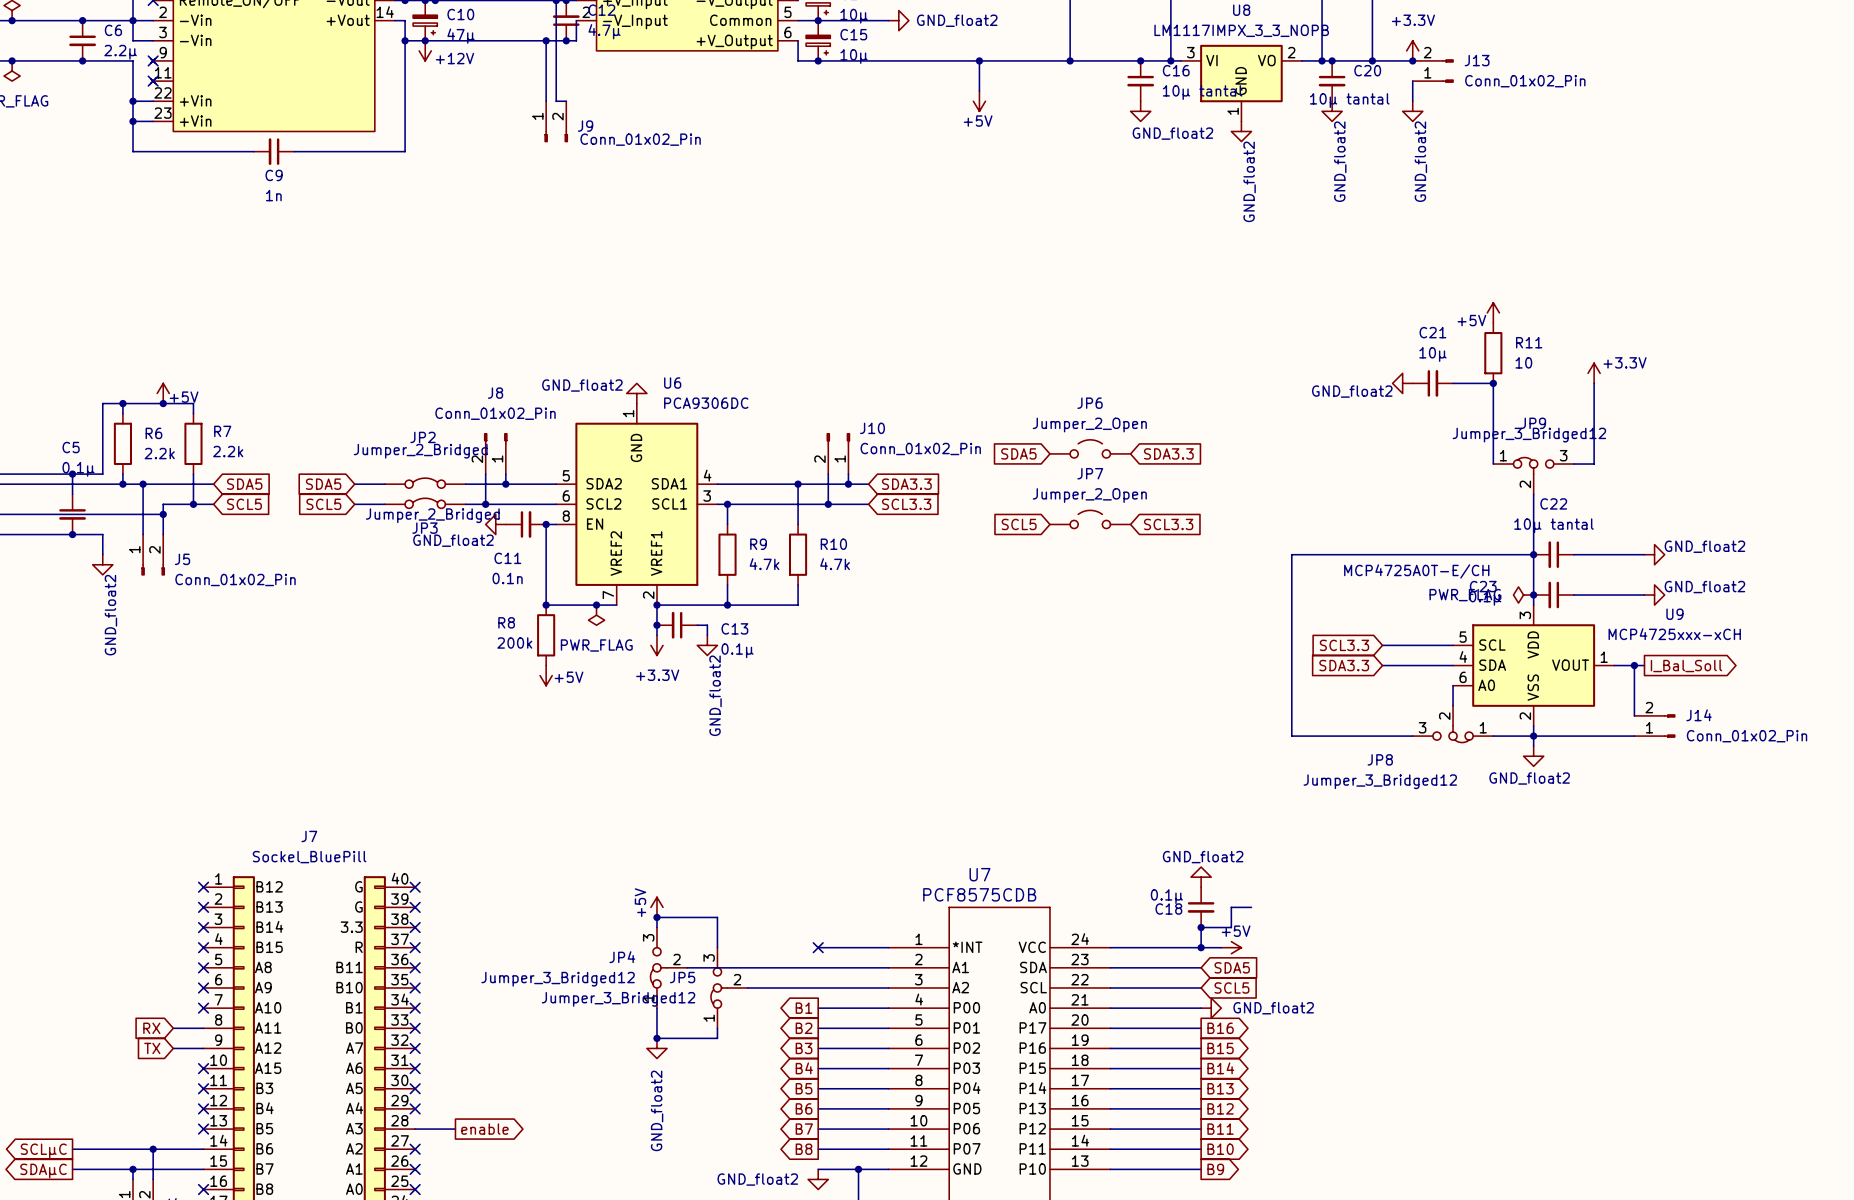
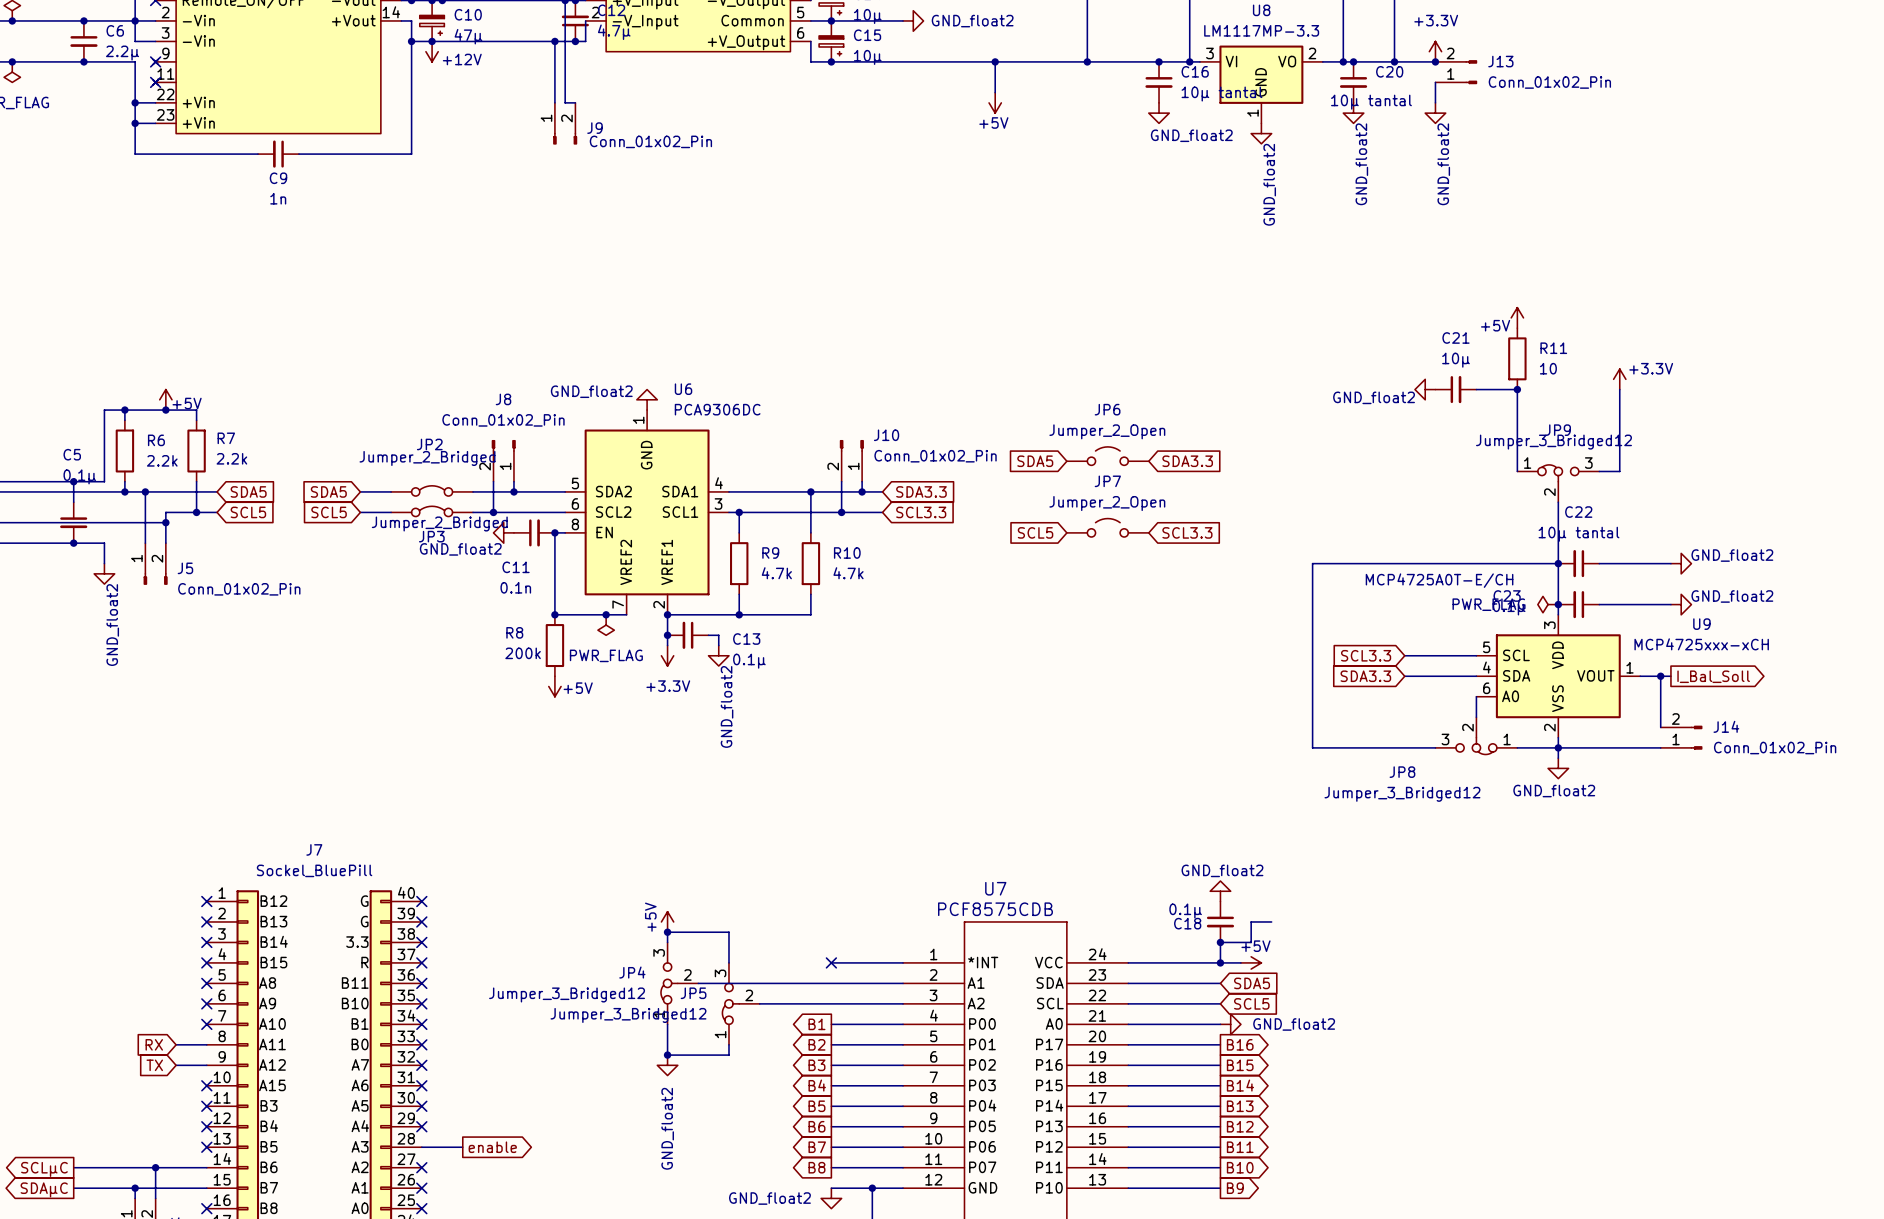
U8 value: LM1117IMPX_3_3_NOPB (1241, 30) -> LM1117MP-3.3 (1261, 30)

